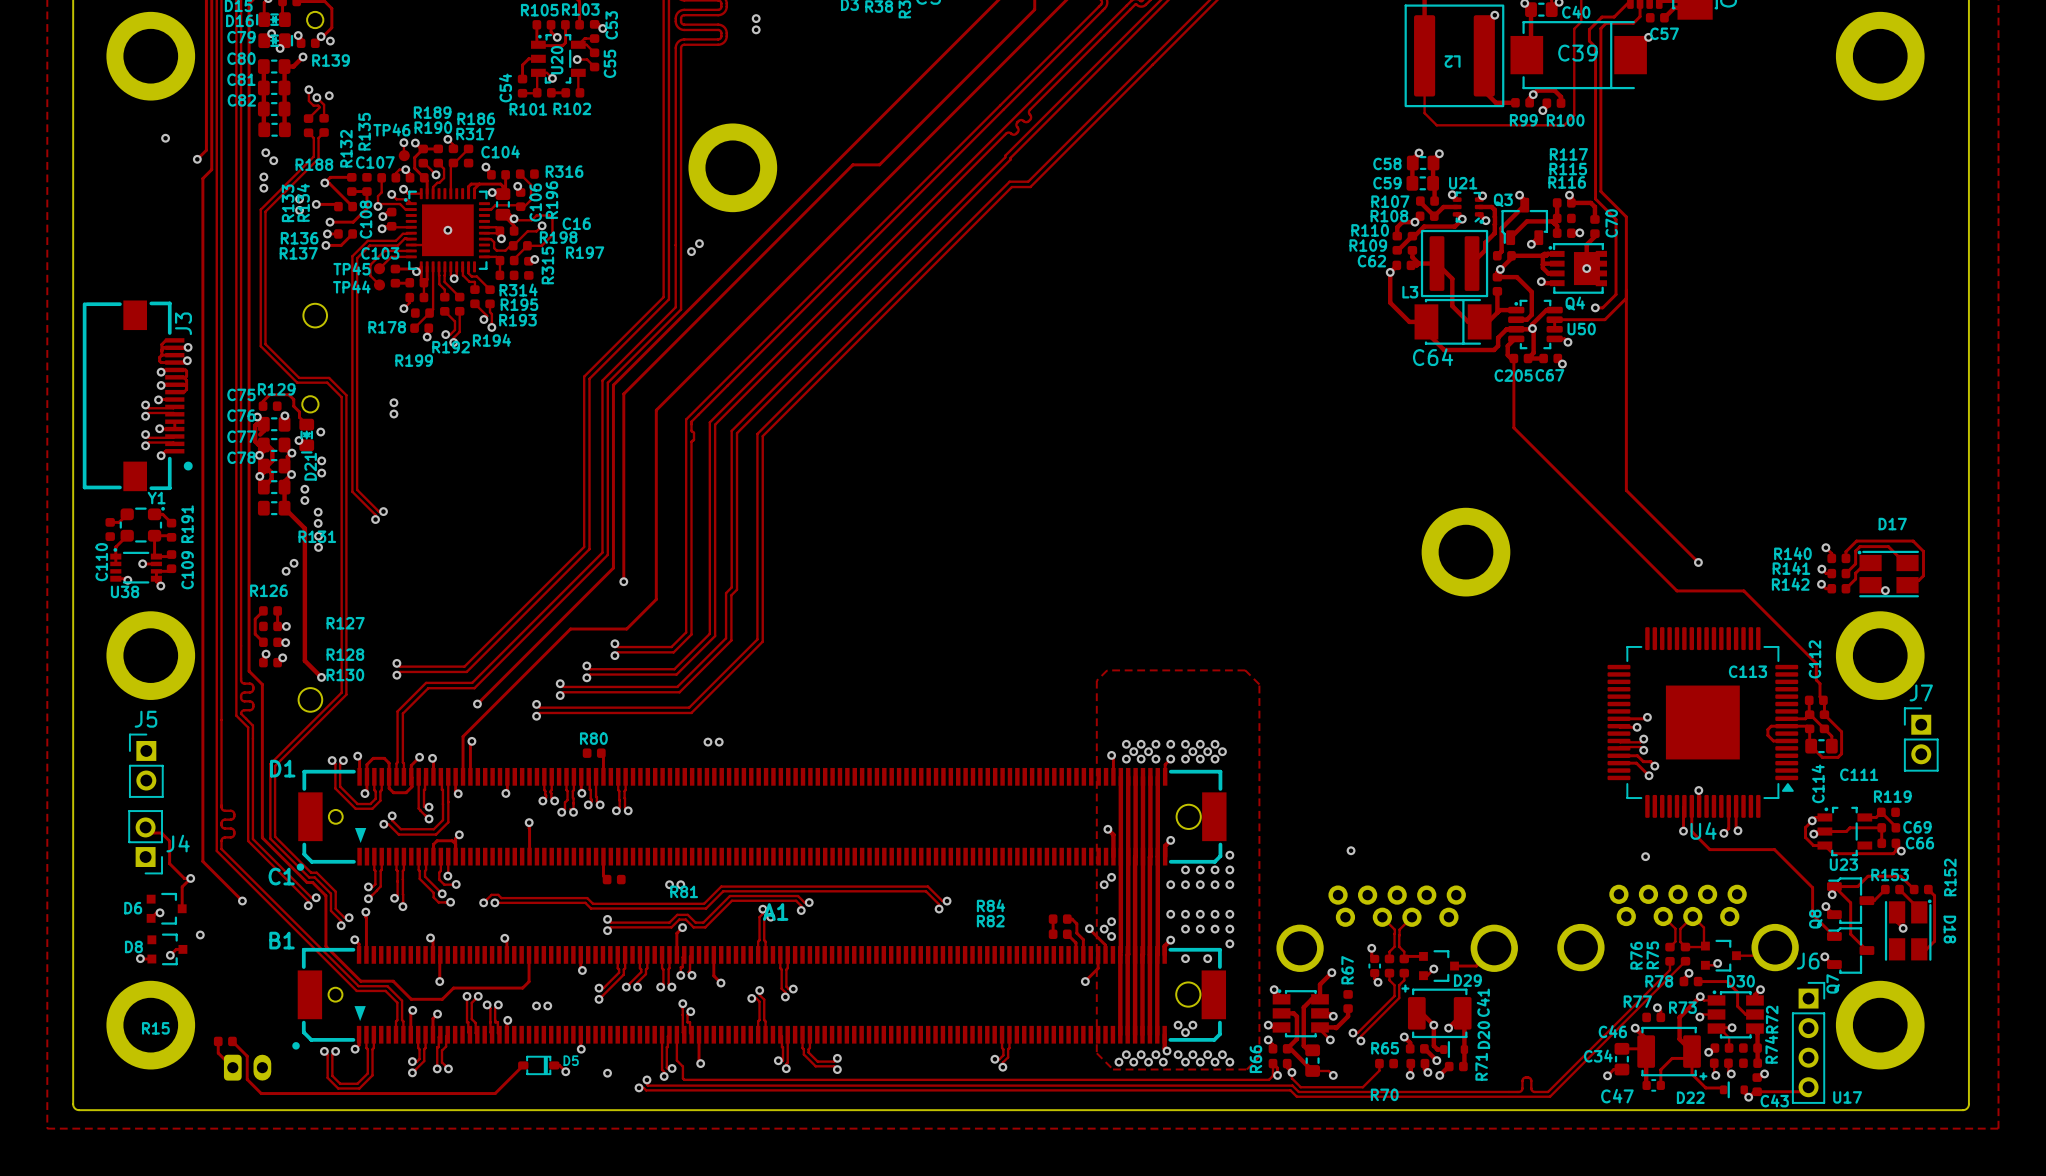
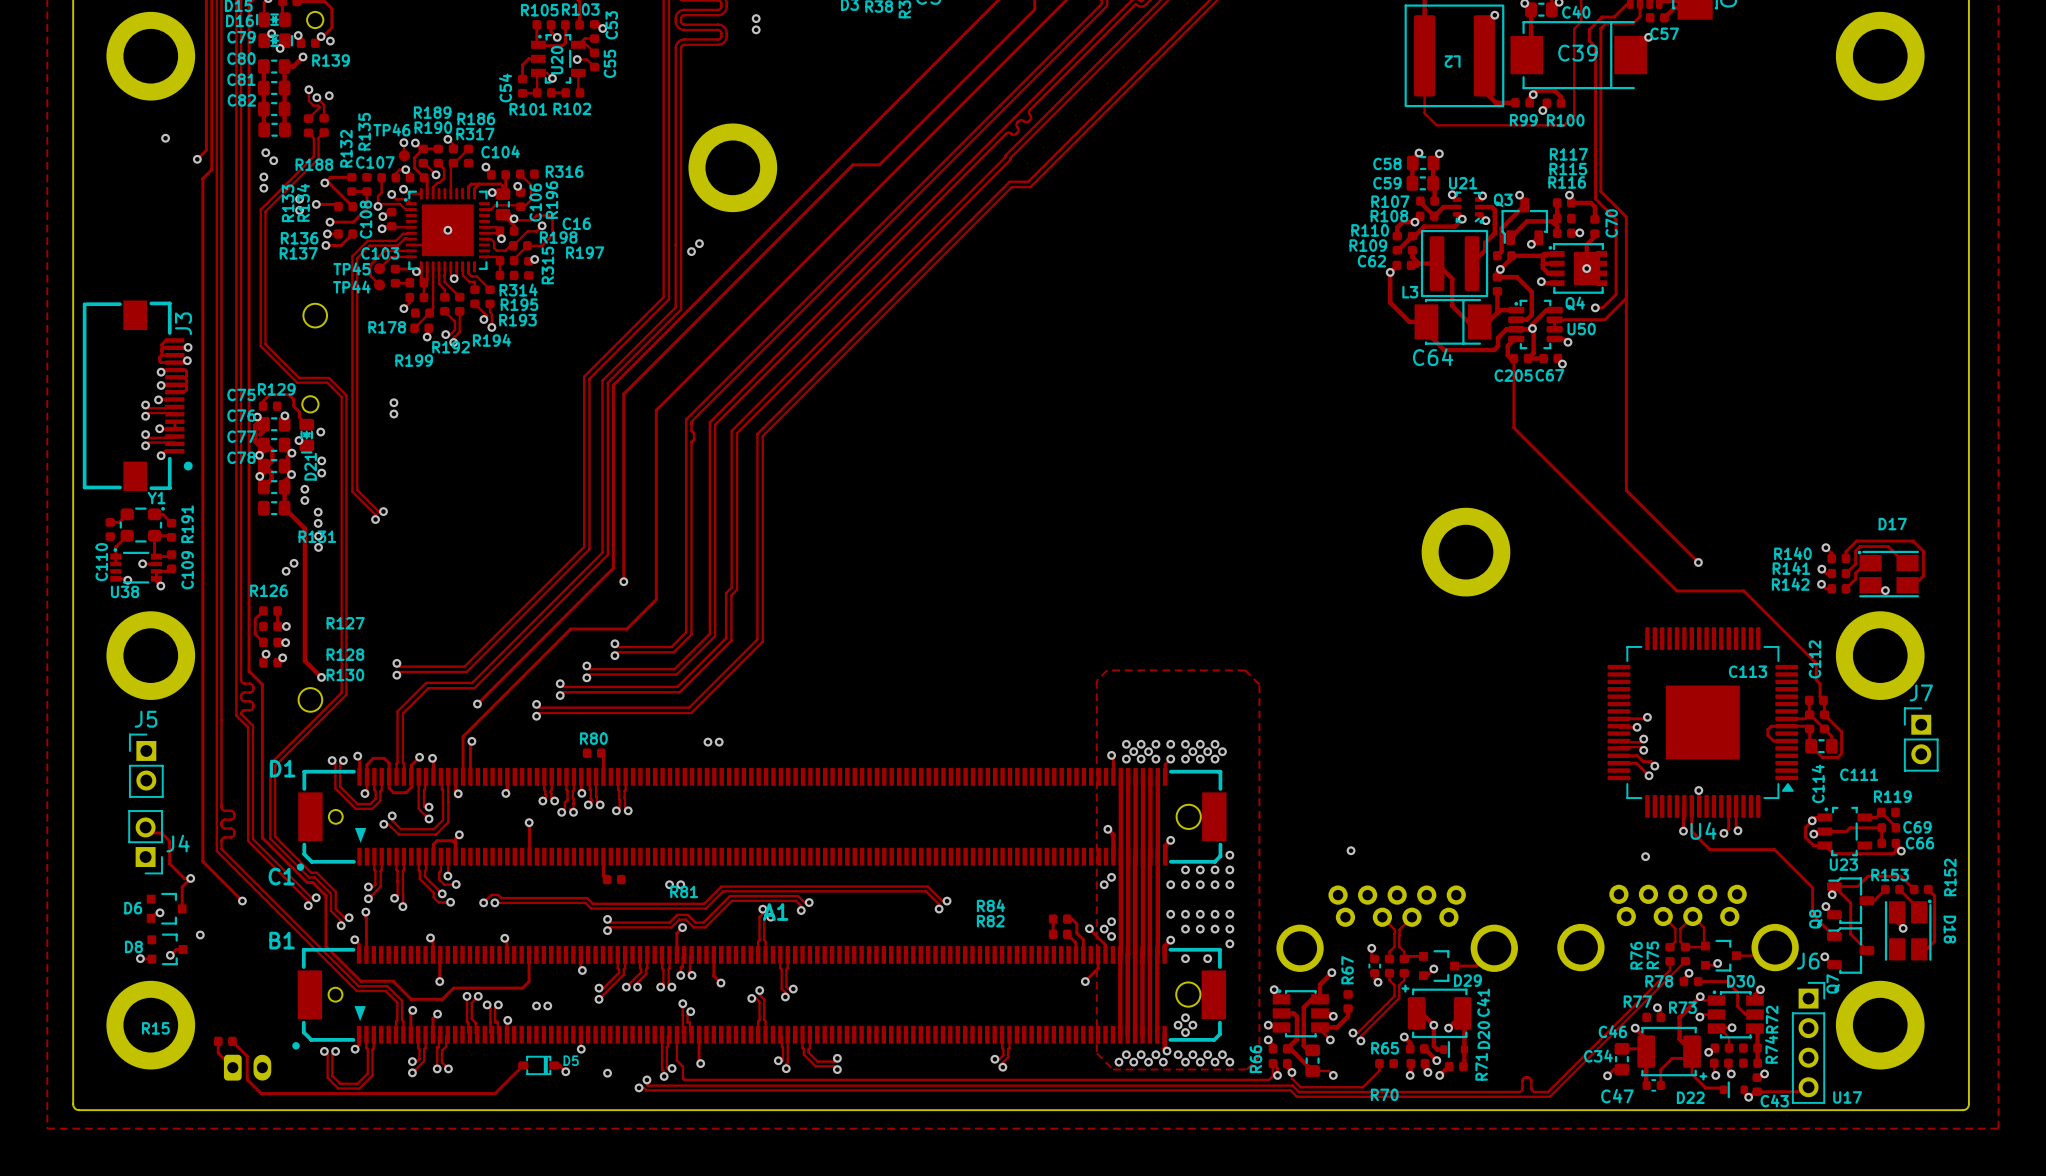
via: none -> (1185, 1017)

